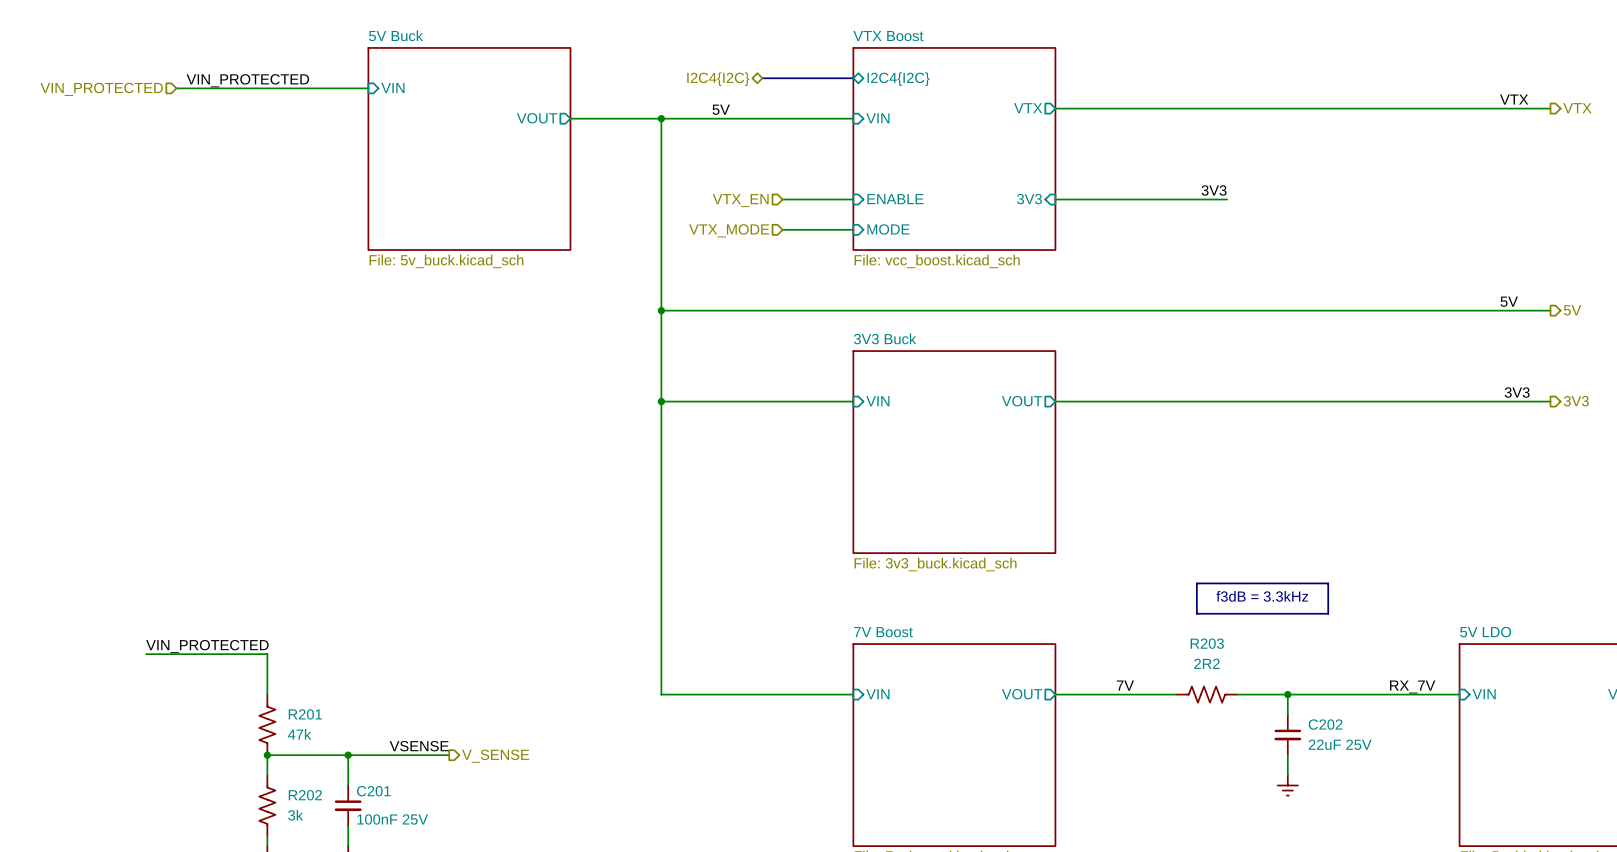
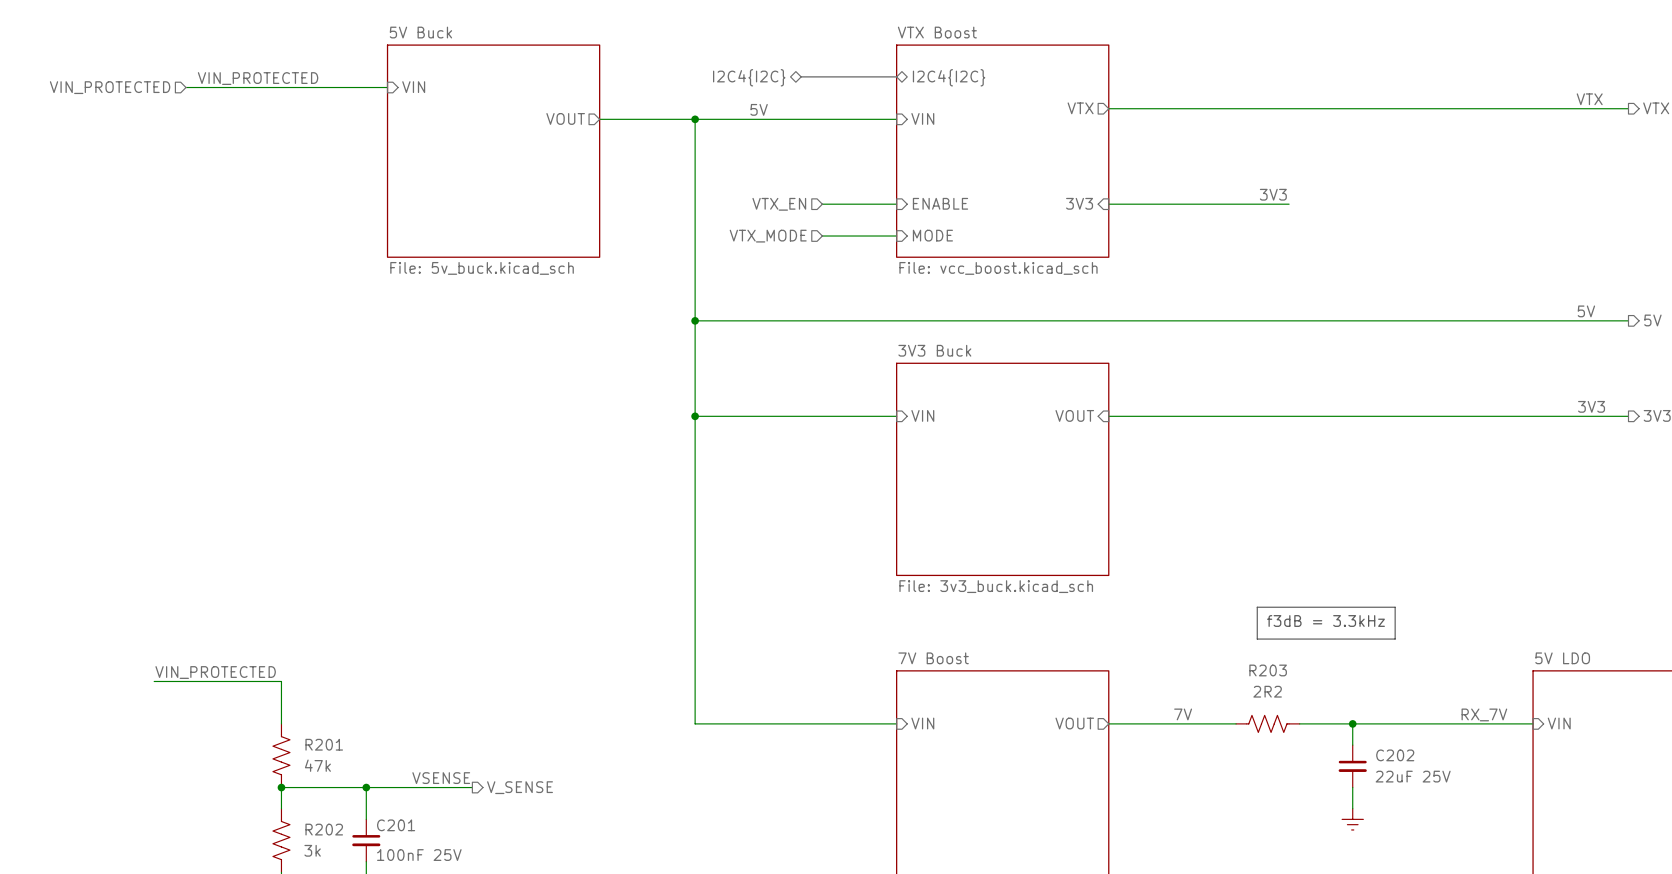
sheet pin shape: output (1022, 401) -> input (1074, 415)

